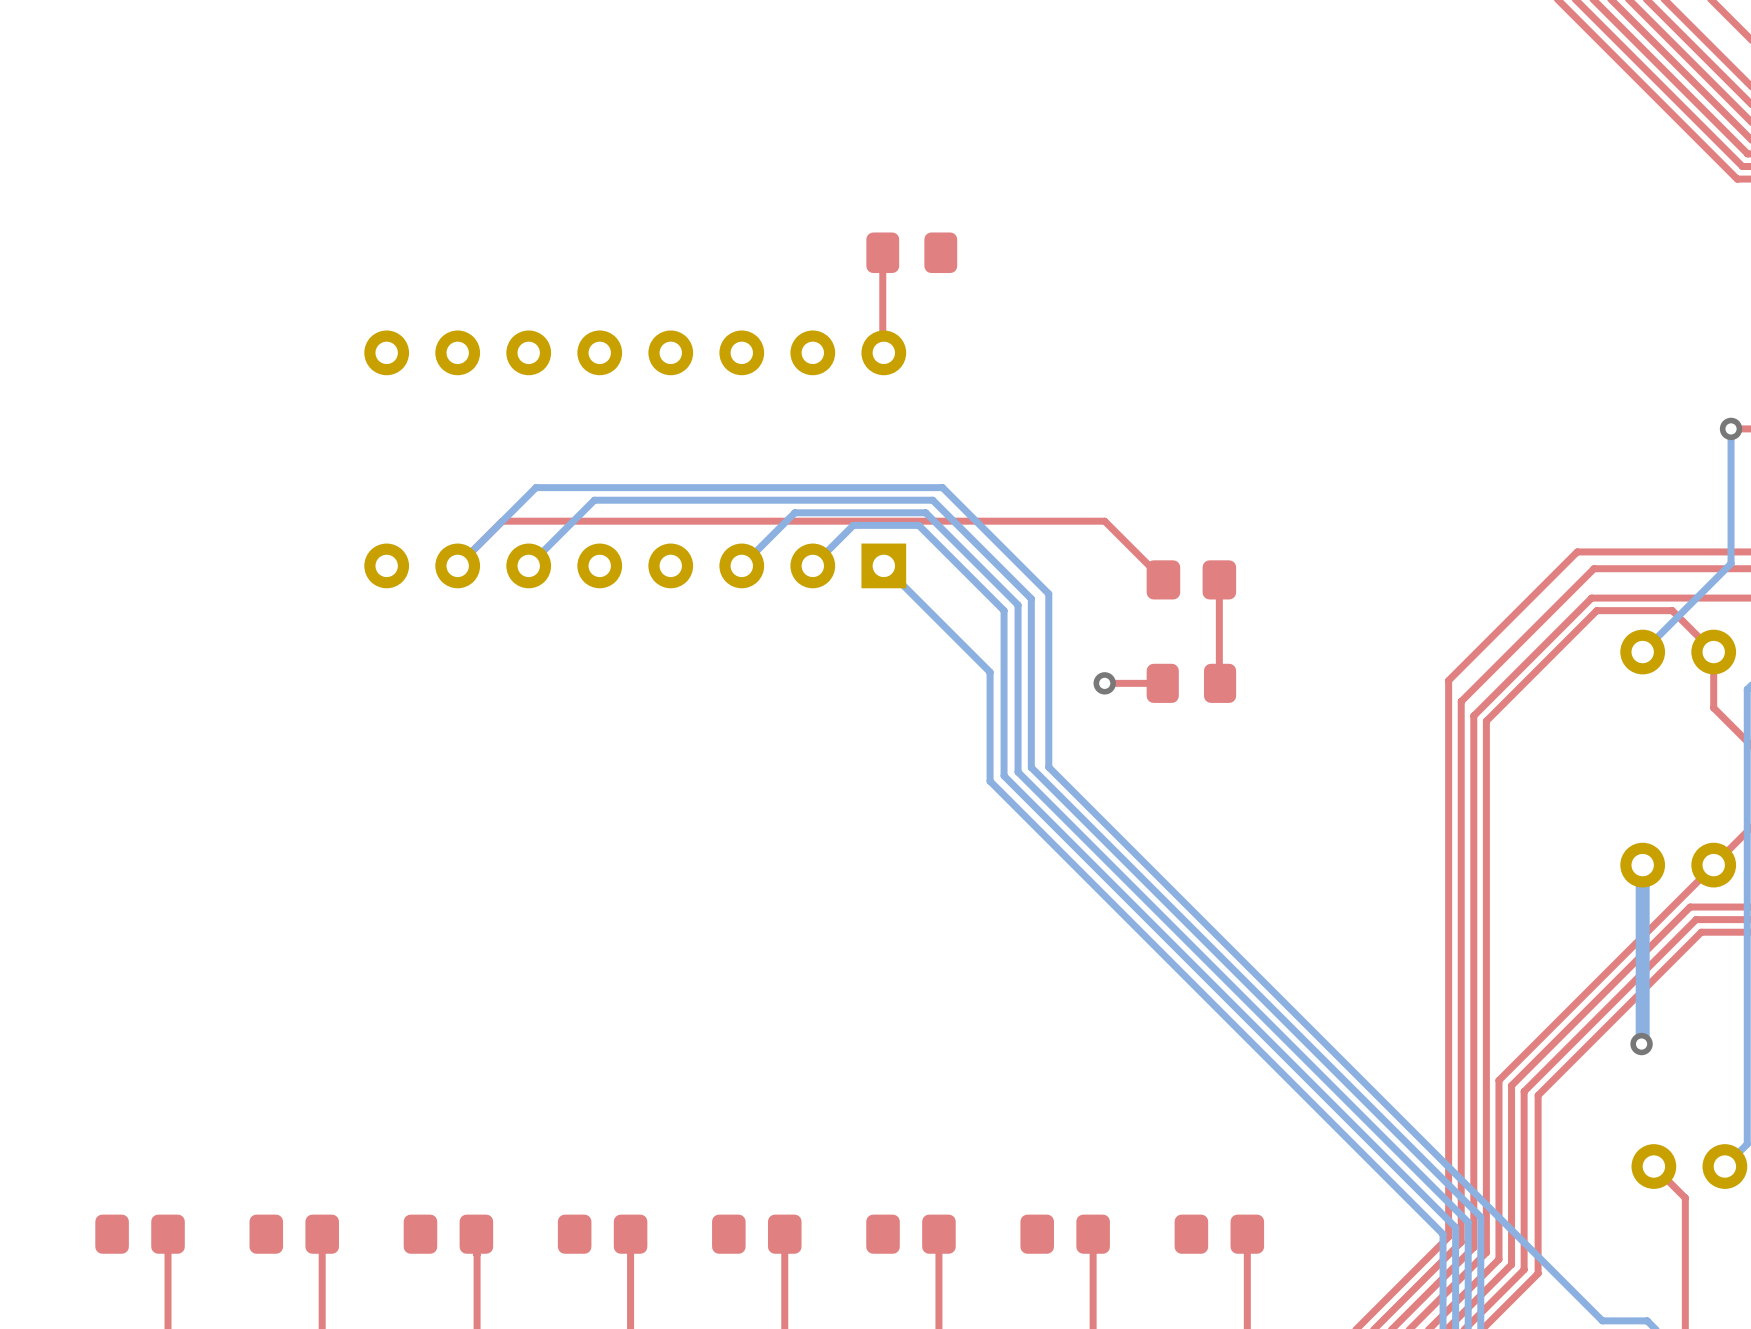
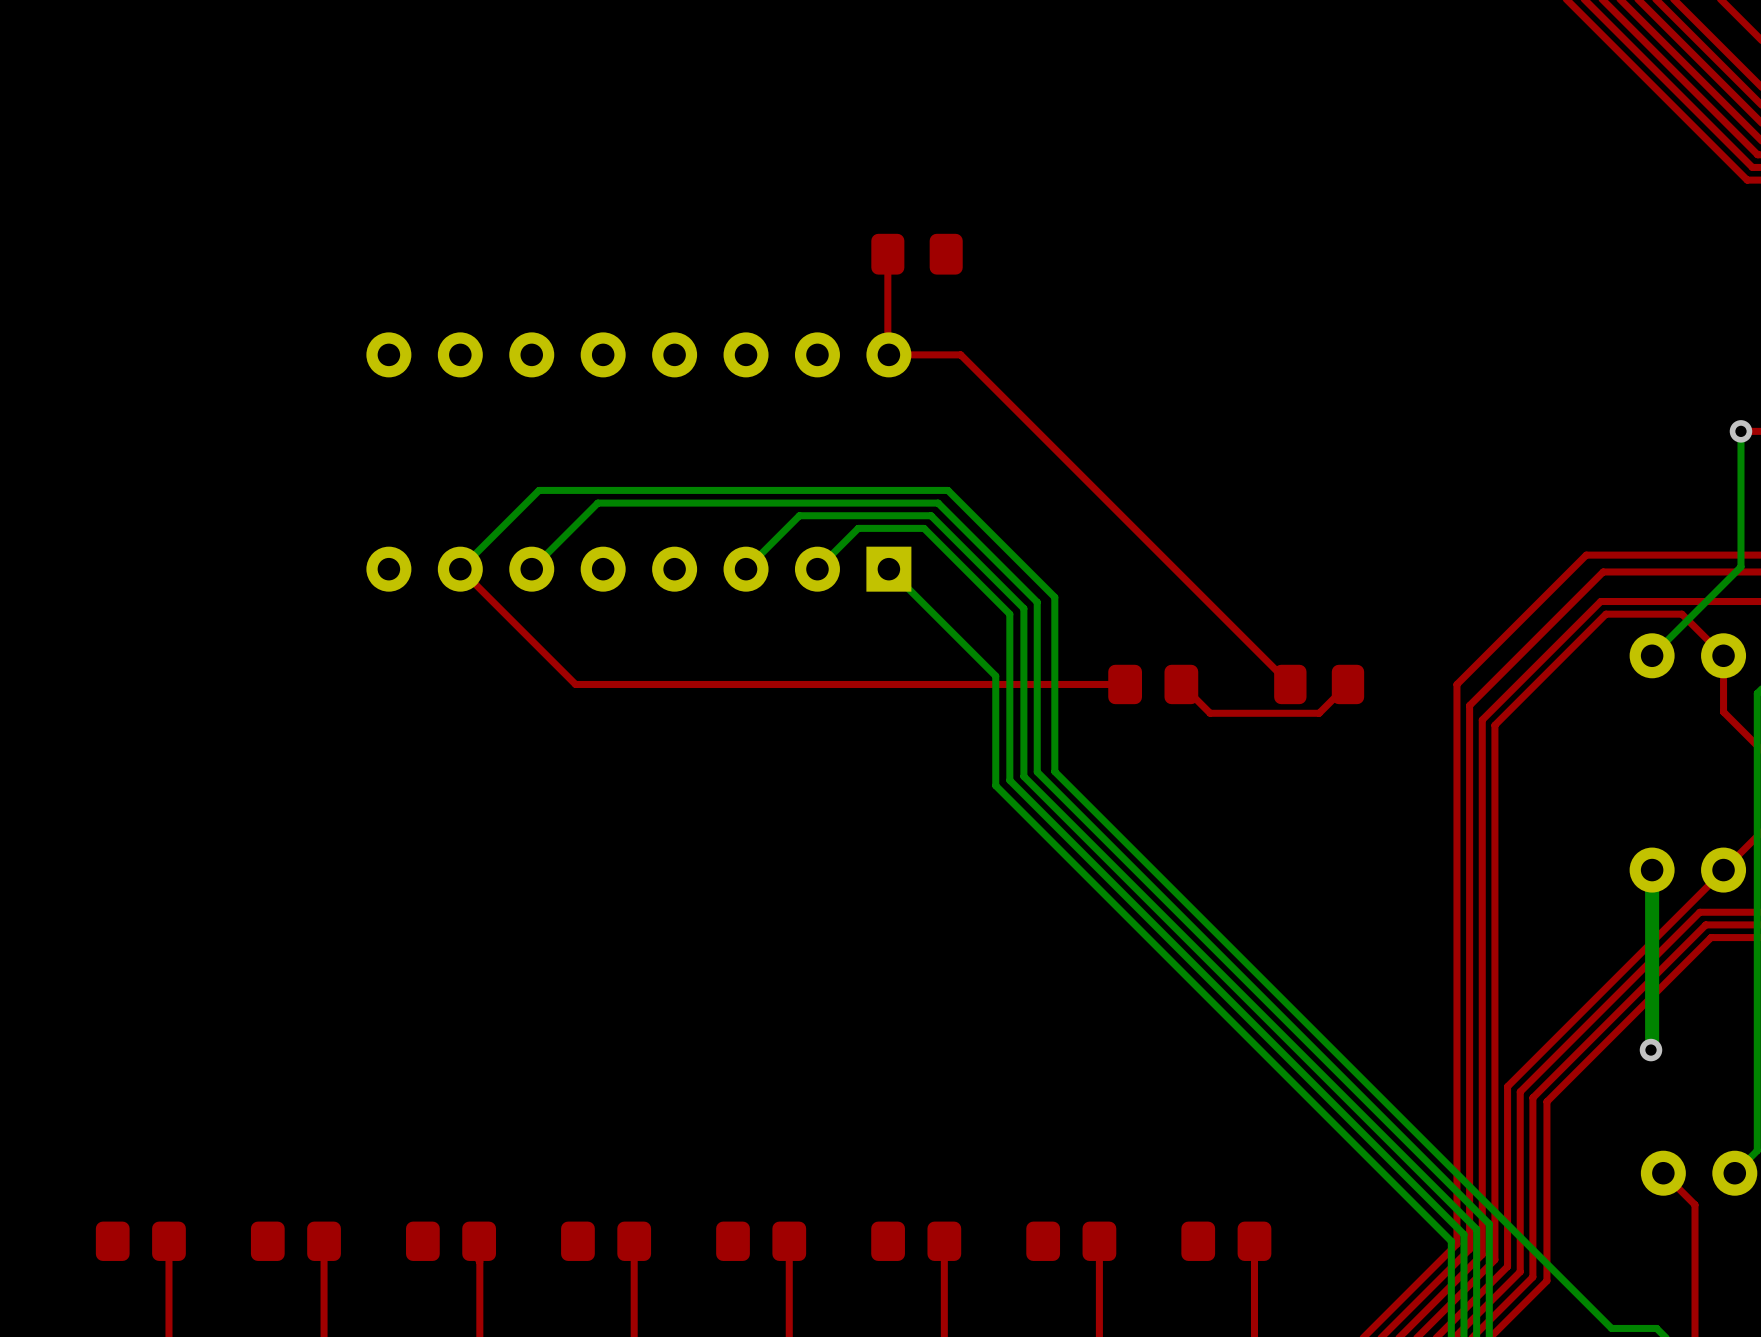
top track: none -> (888, 354) (960, 354) (1290, 684)
top track: (457, 565) (502, 521) (1104, 521) (1163, 579) -> (460, 569) (575, 684) (1125, 684)
part position: (1191, 579) -> (1153, 684)
top track: (1219, 579) (1220, 683) -> none
top track: none -> (1347, 684) (1319, 713) (1210, 713) (1181, 684)
via: (1104, 683) -> none
top track: (1162, 683) (1104, 683) -> none
part position: (1191, 683) -> (1319, 684)

